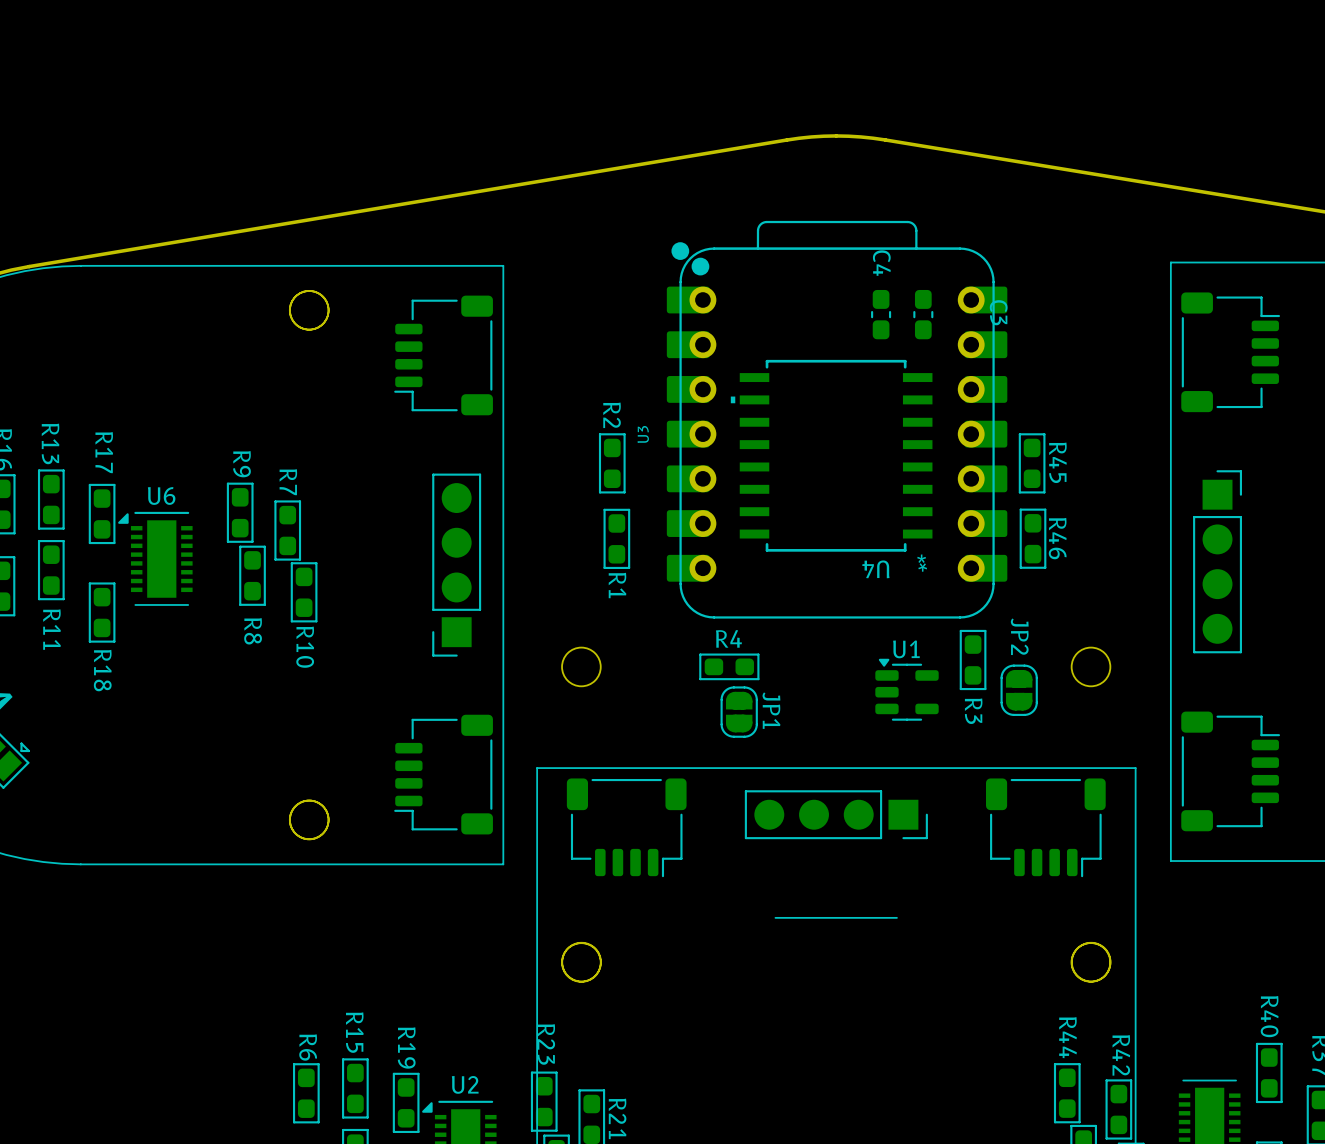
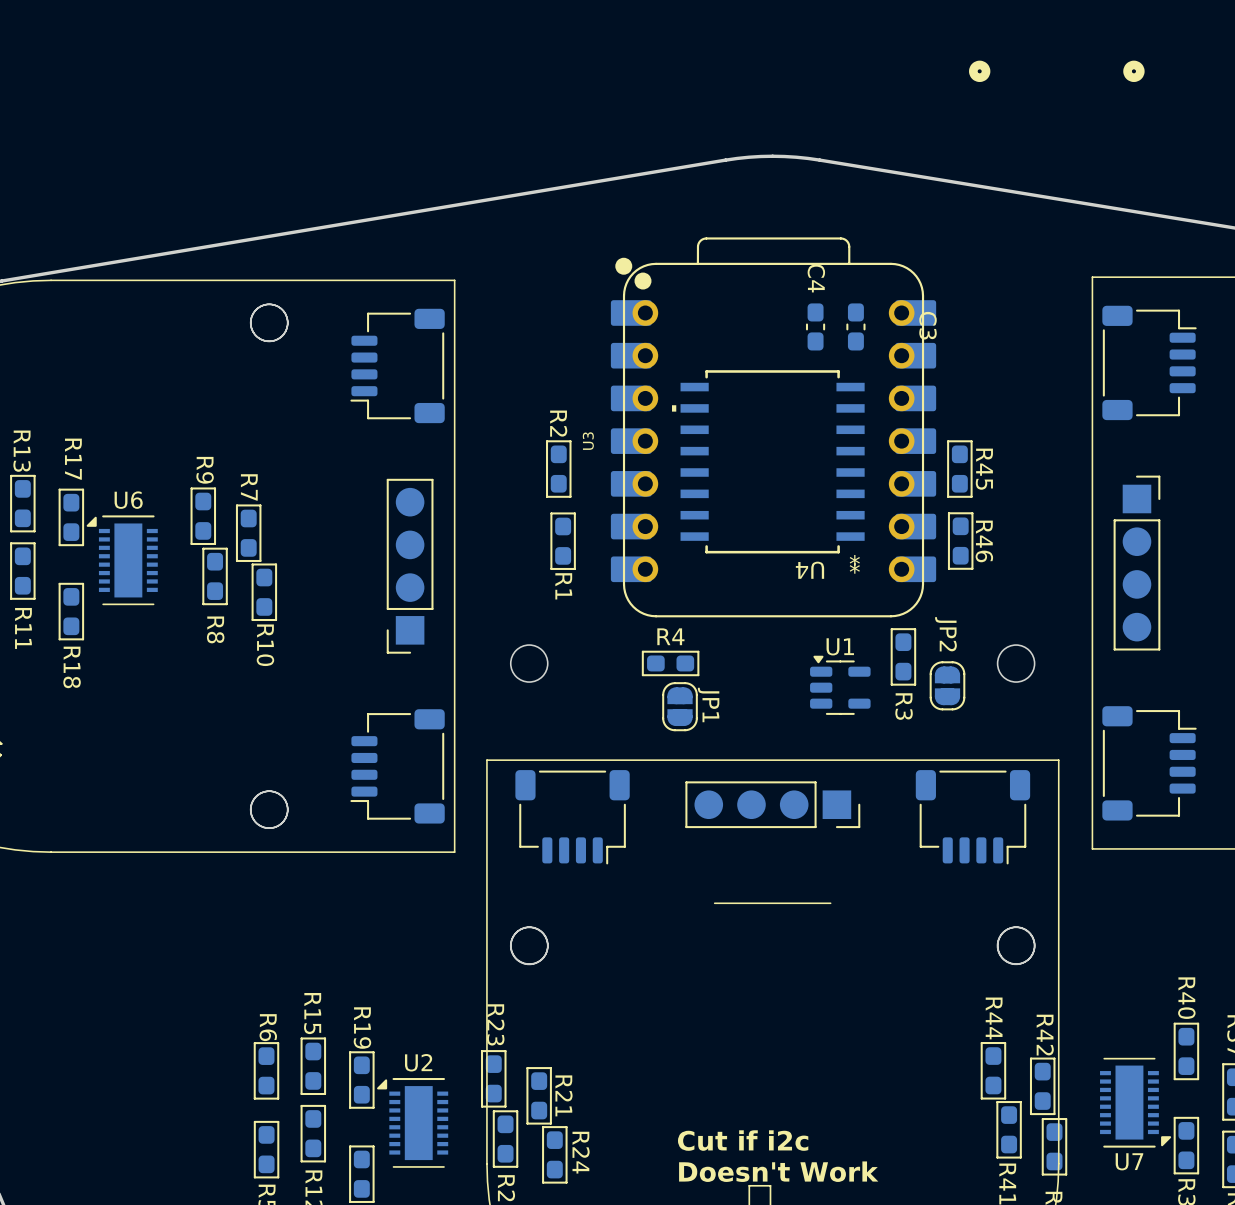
part: none -> (979, 71)
part: none -> (1133, 71)

